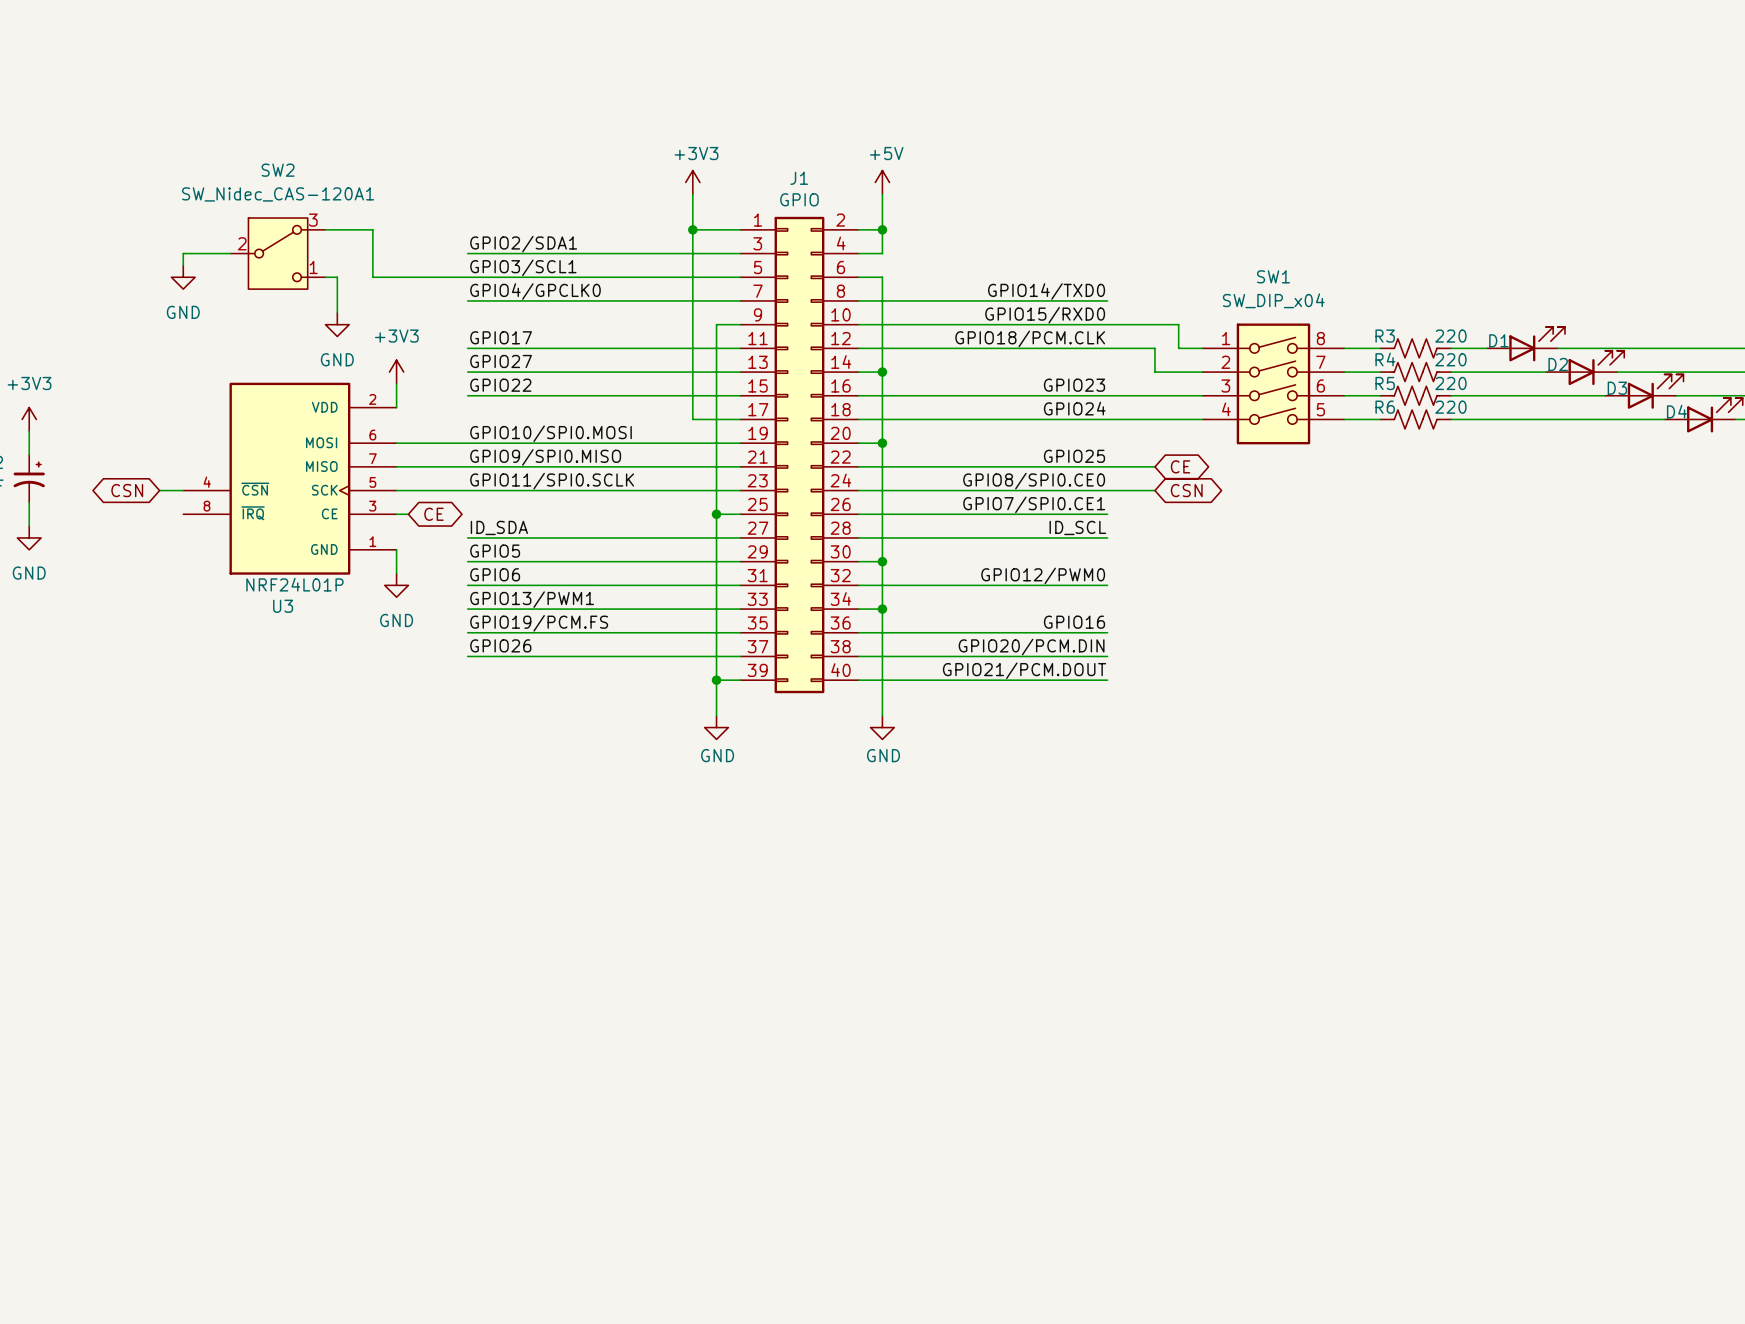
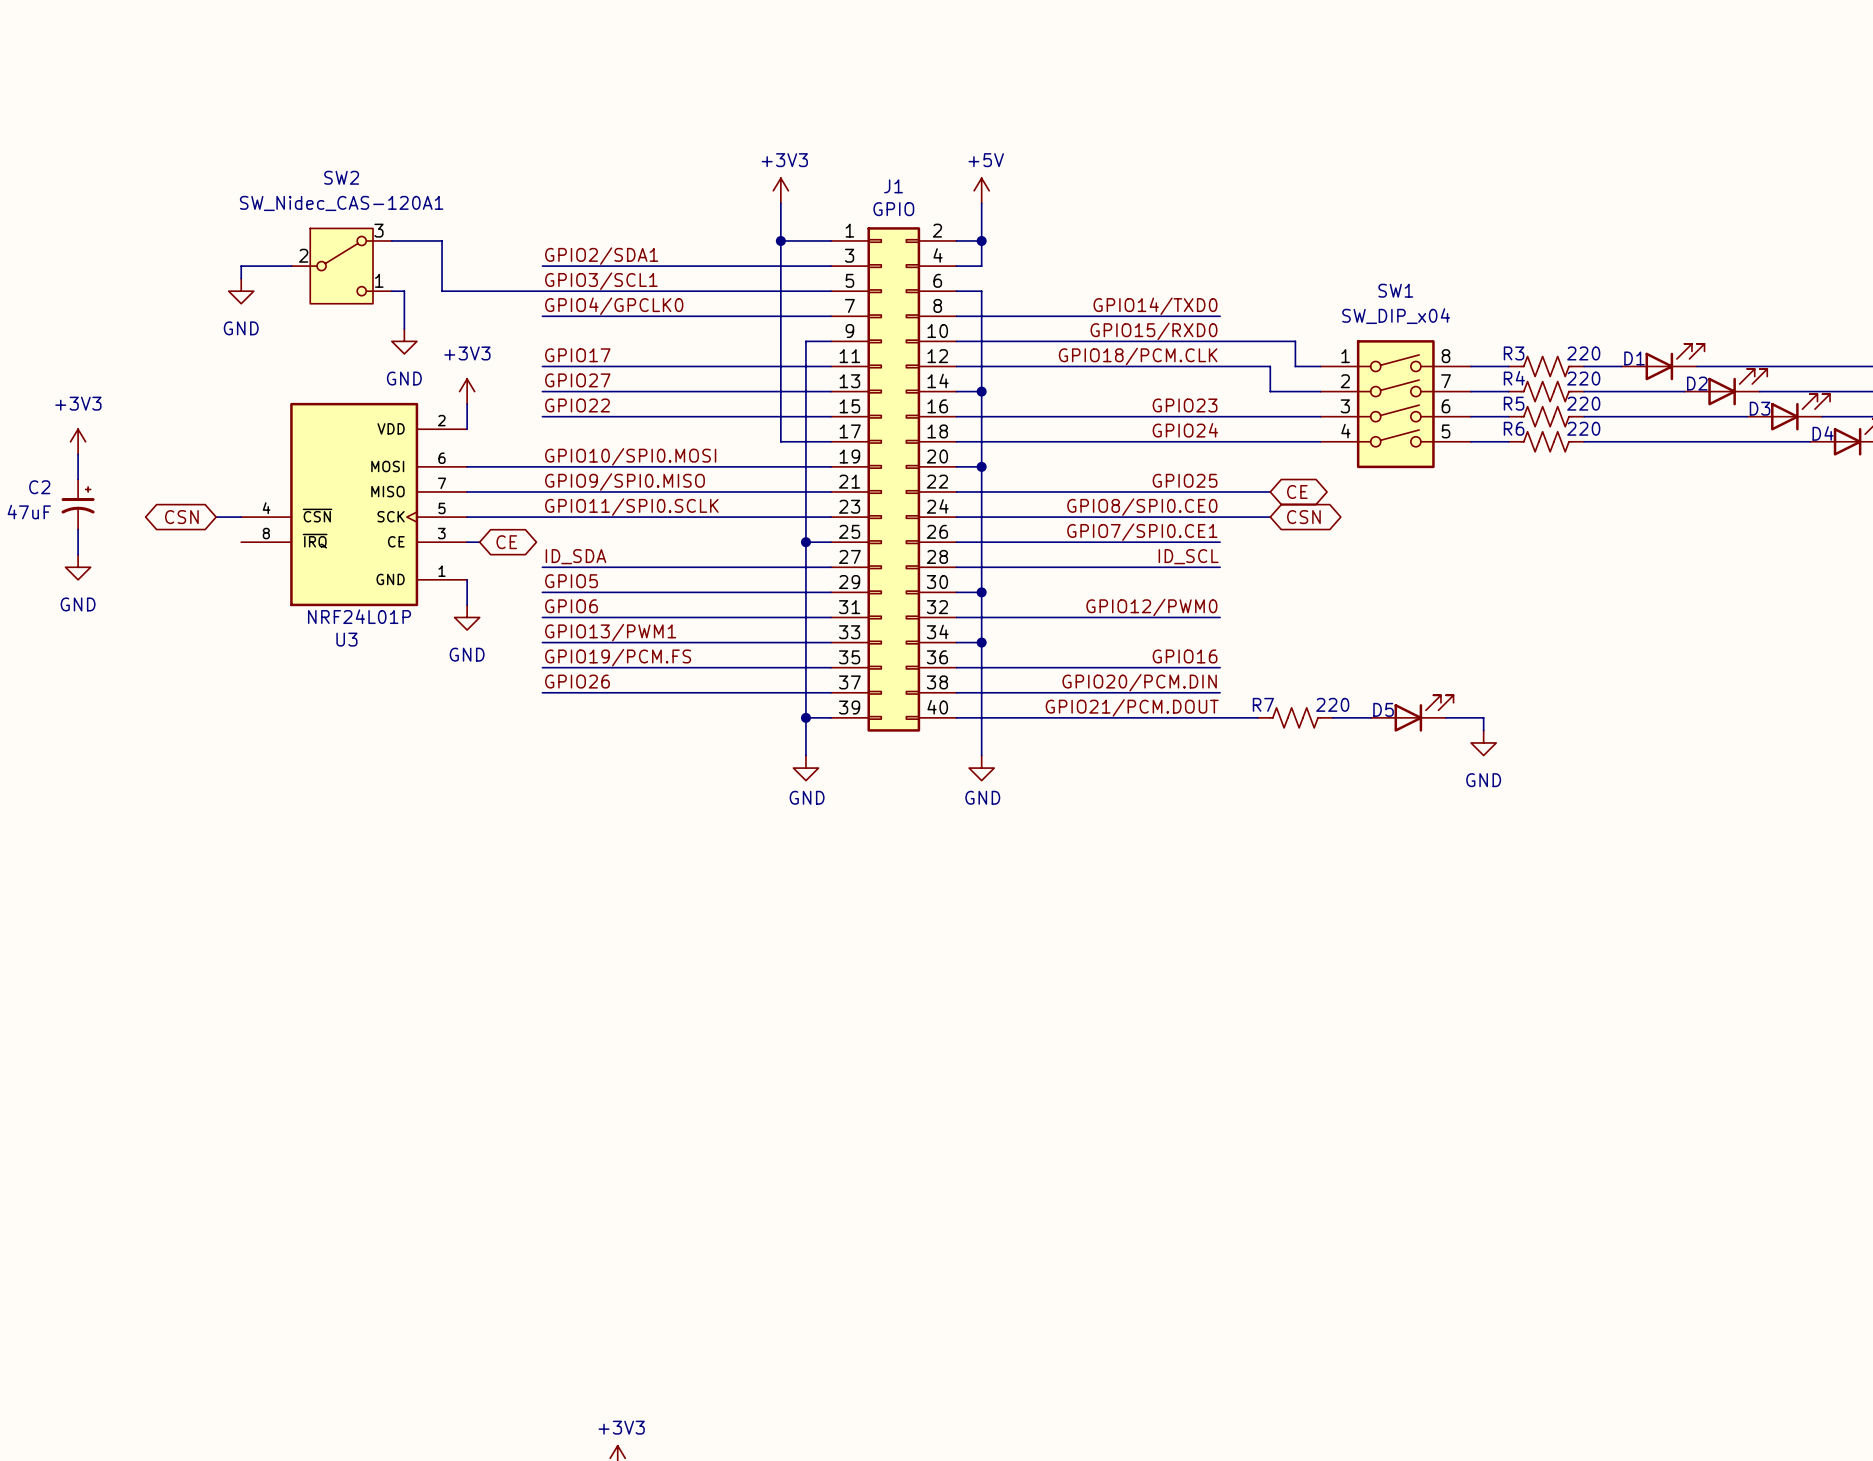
D5: none -> (1412, 713)
wire: none -> (1220, 717) (1257, 717)
R7: none -> 220 (1295, 717)
wire: none -> (1333, 717) (1370, 717)
wire: none -> (1446, 717) (1483, 717) (1483, 730)
power symbol: none -> GND (1483, 742)

